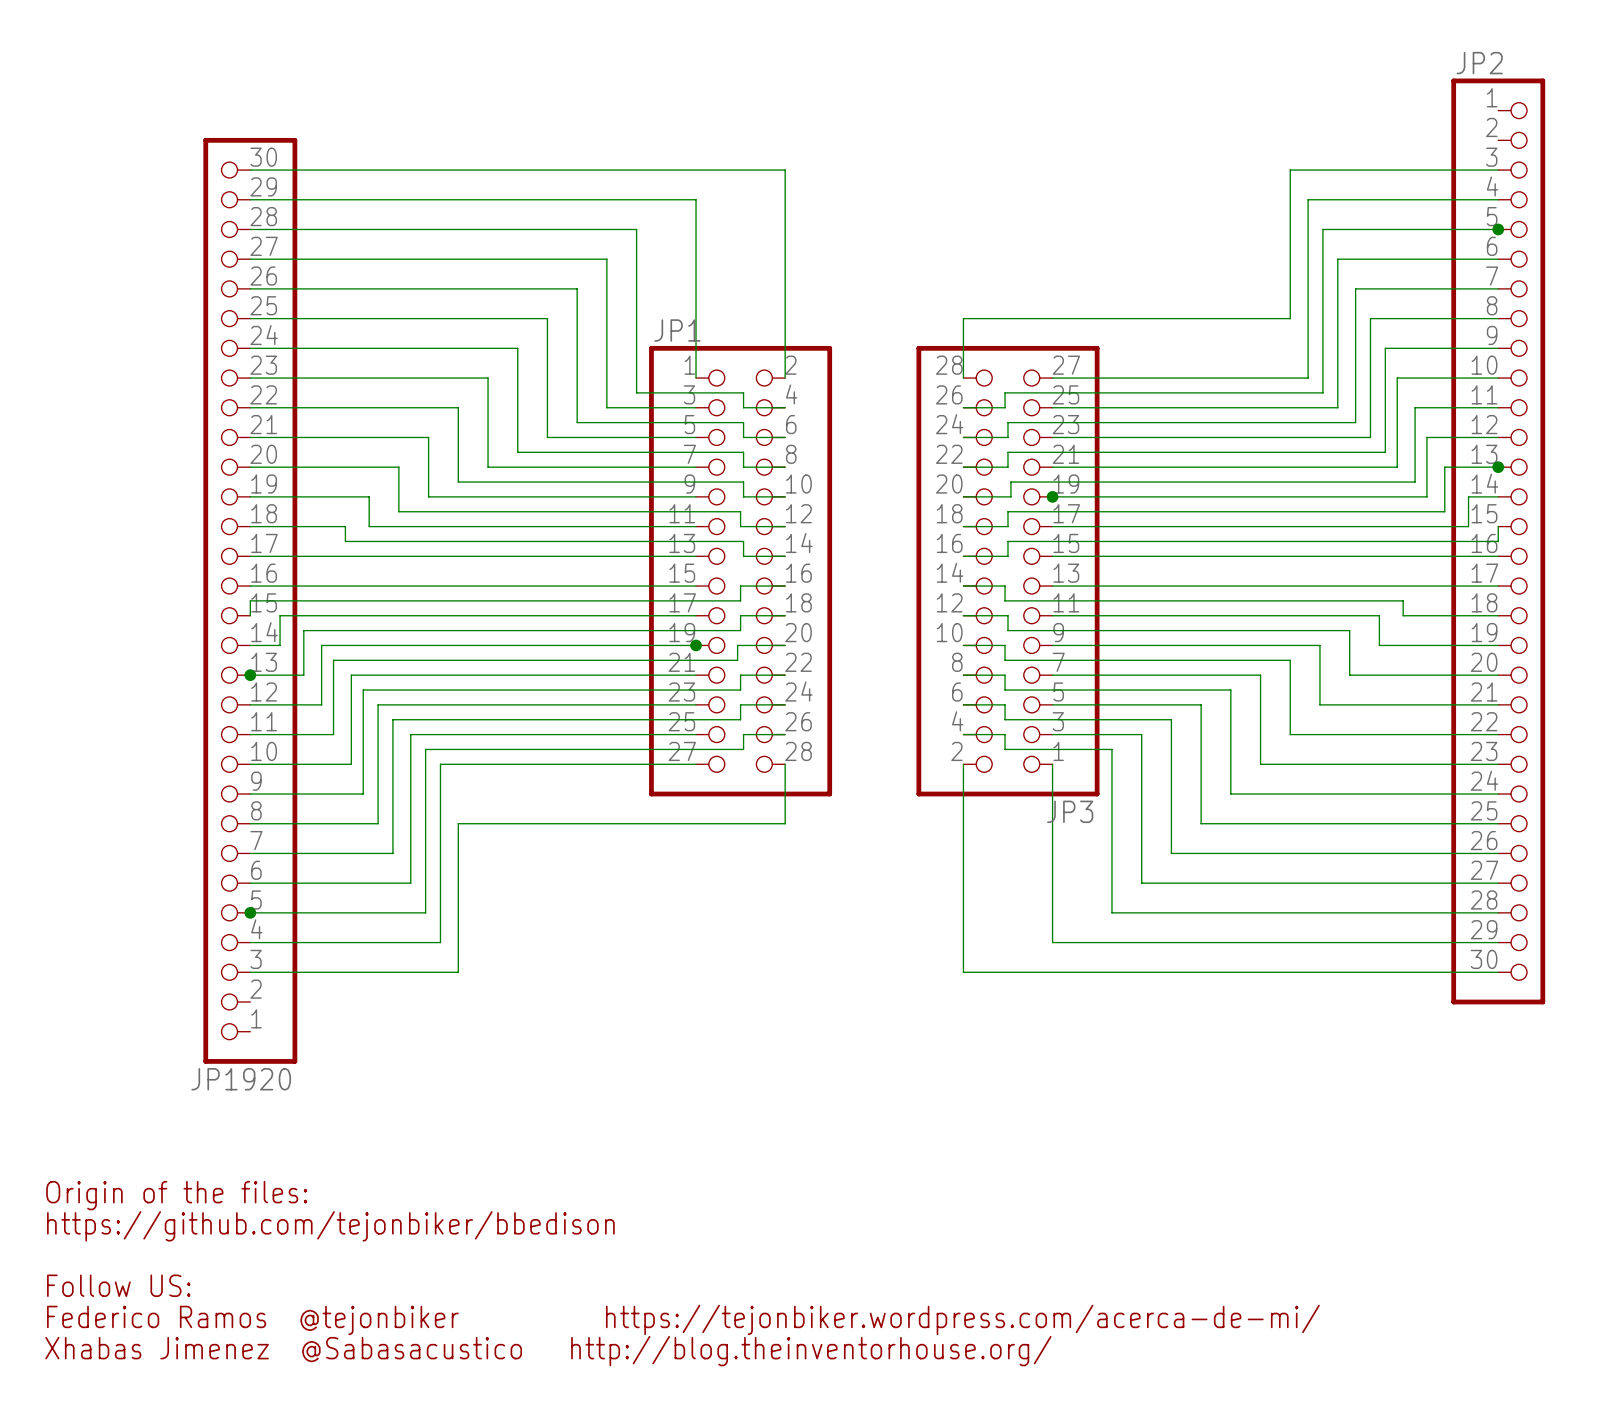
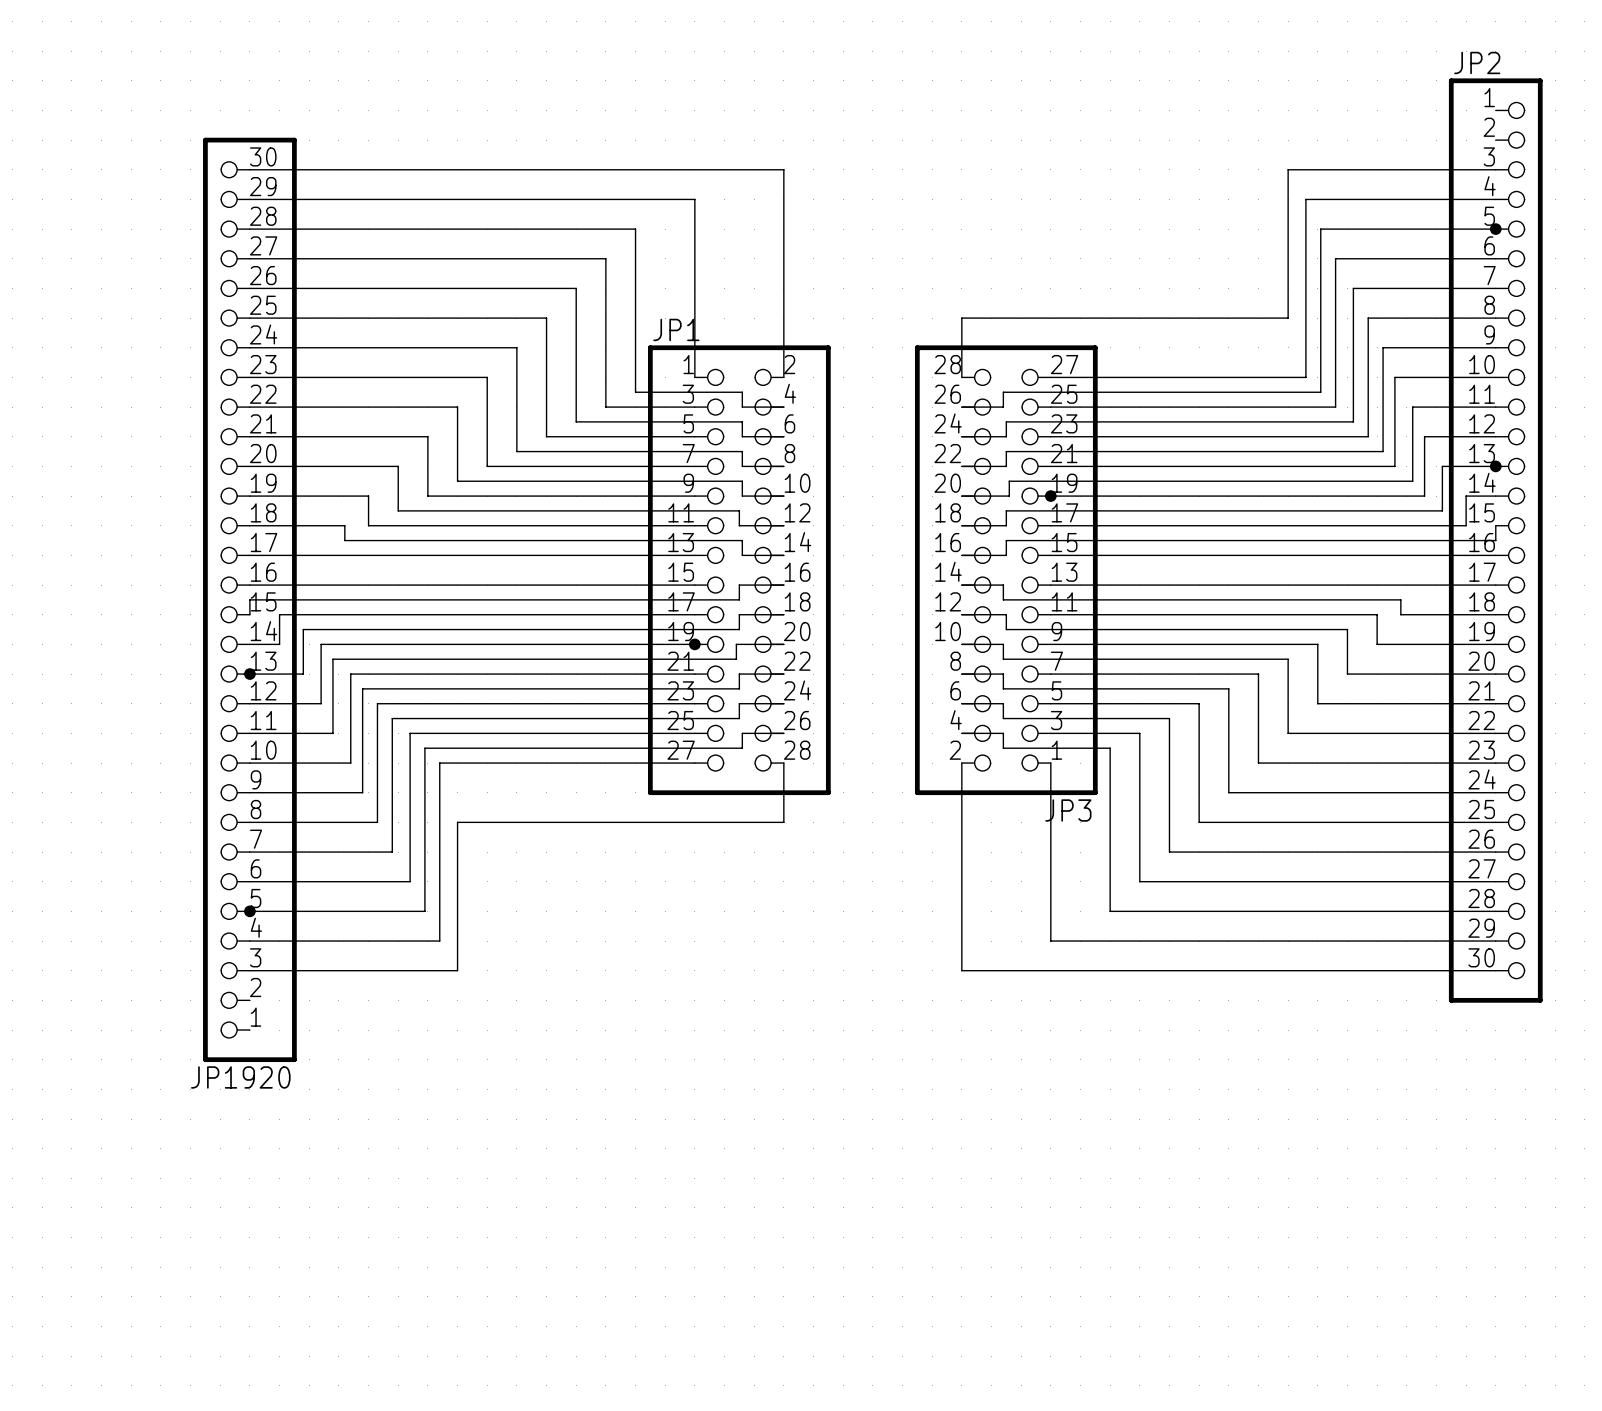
text: Origin of the files: (176, 1195) -> none
text: https://github.com/tejonbiker/bbedison (330, 1226) -> none
text: Follow US: (118, 1285) -> none
text: Federico Ramos @tejonbiker https://tejonbiker.wordpress.com/acerca-de-mi/ (683, 1319) -> none
text: Xhabas Jimenez @Sabasacustico http://blog.theinventorhouse.org/ (548, 1351) -> none

